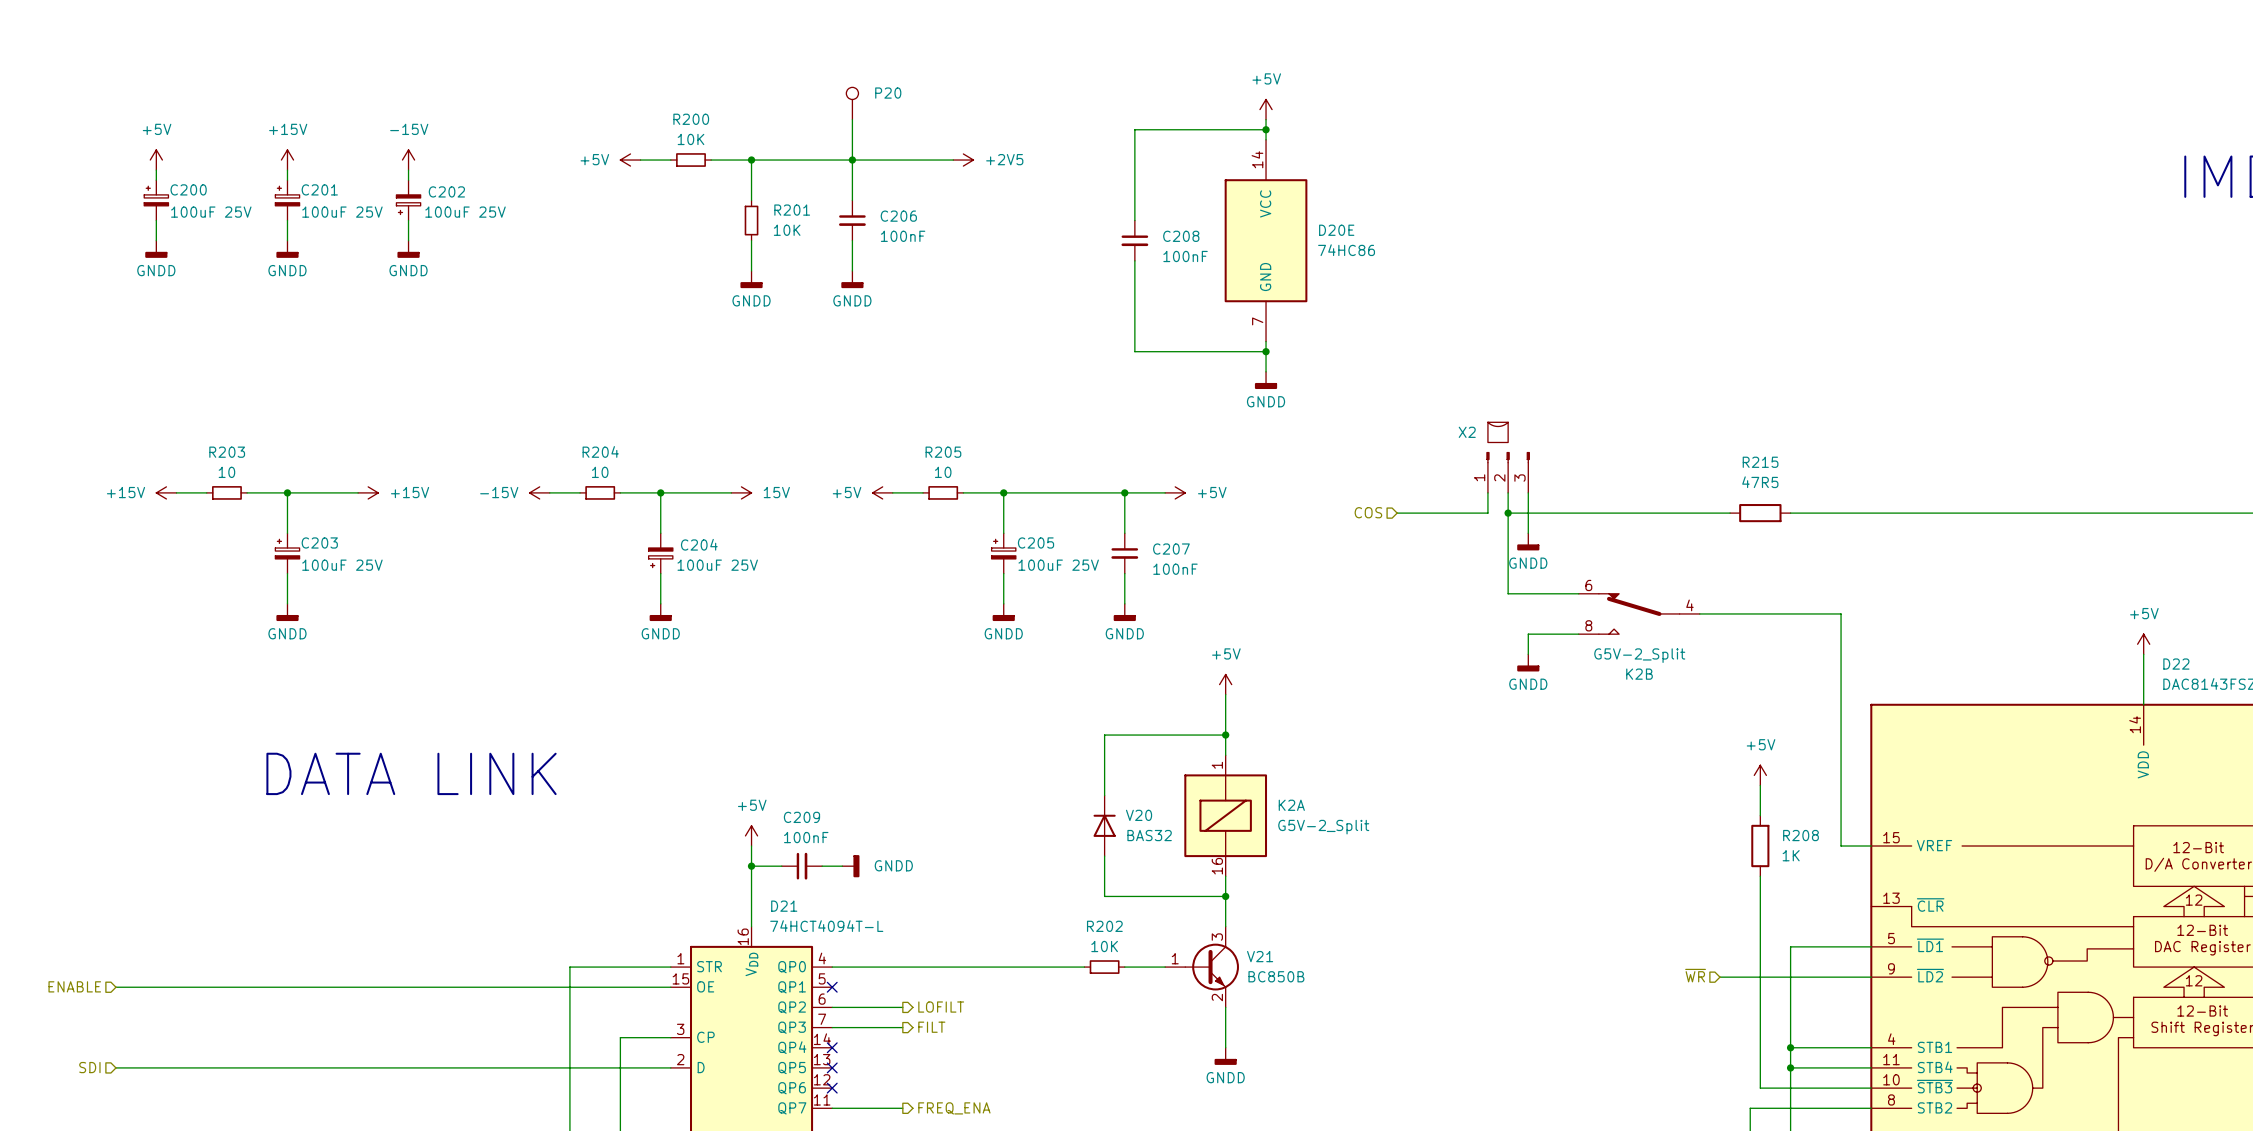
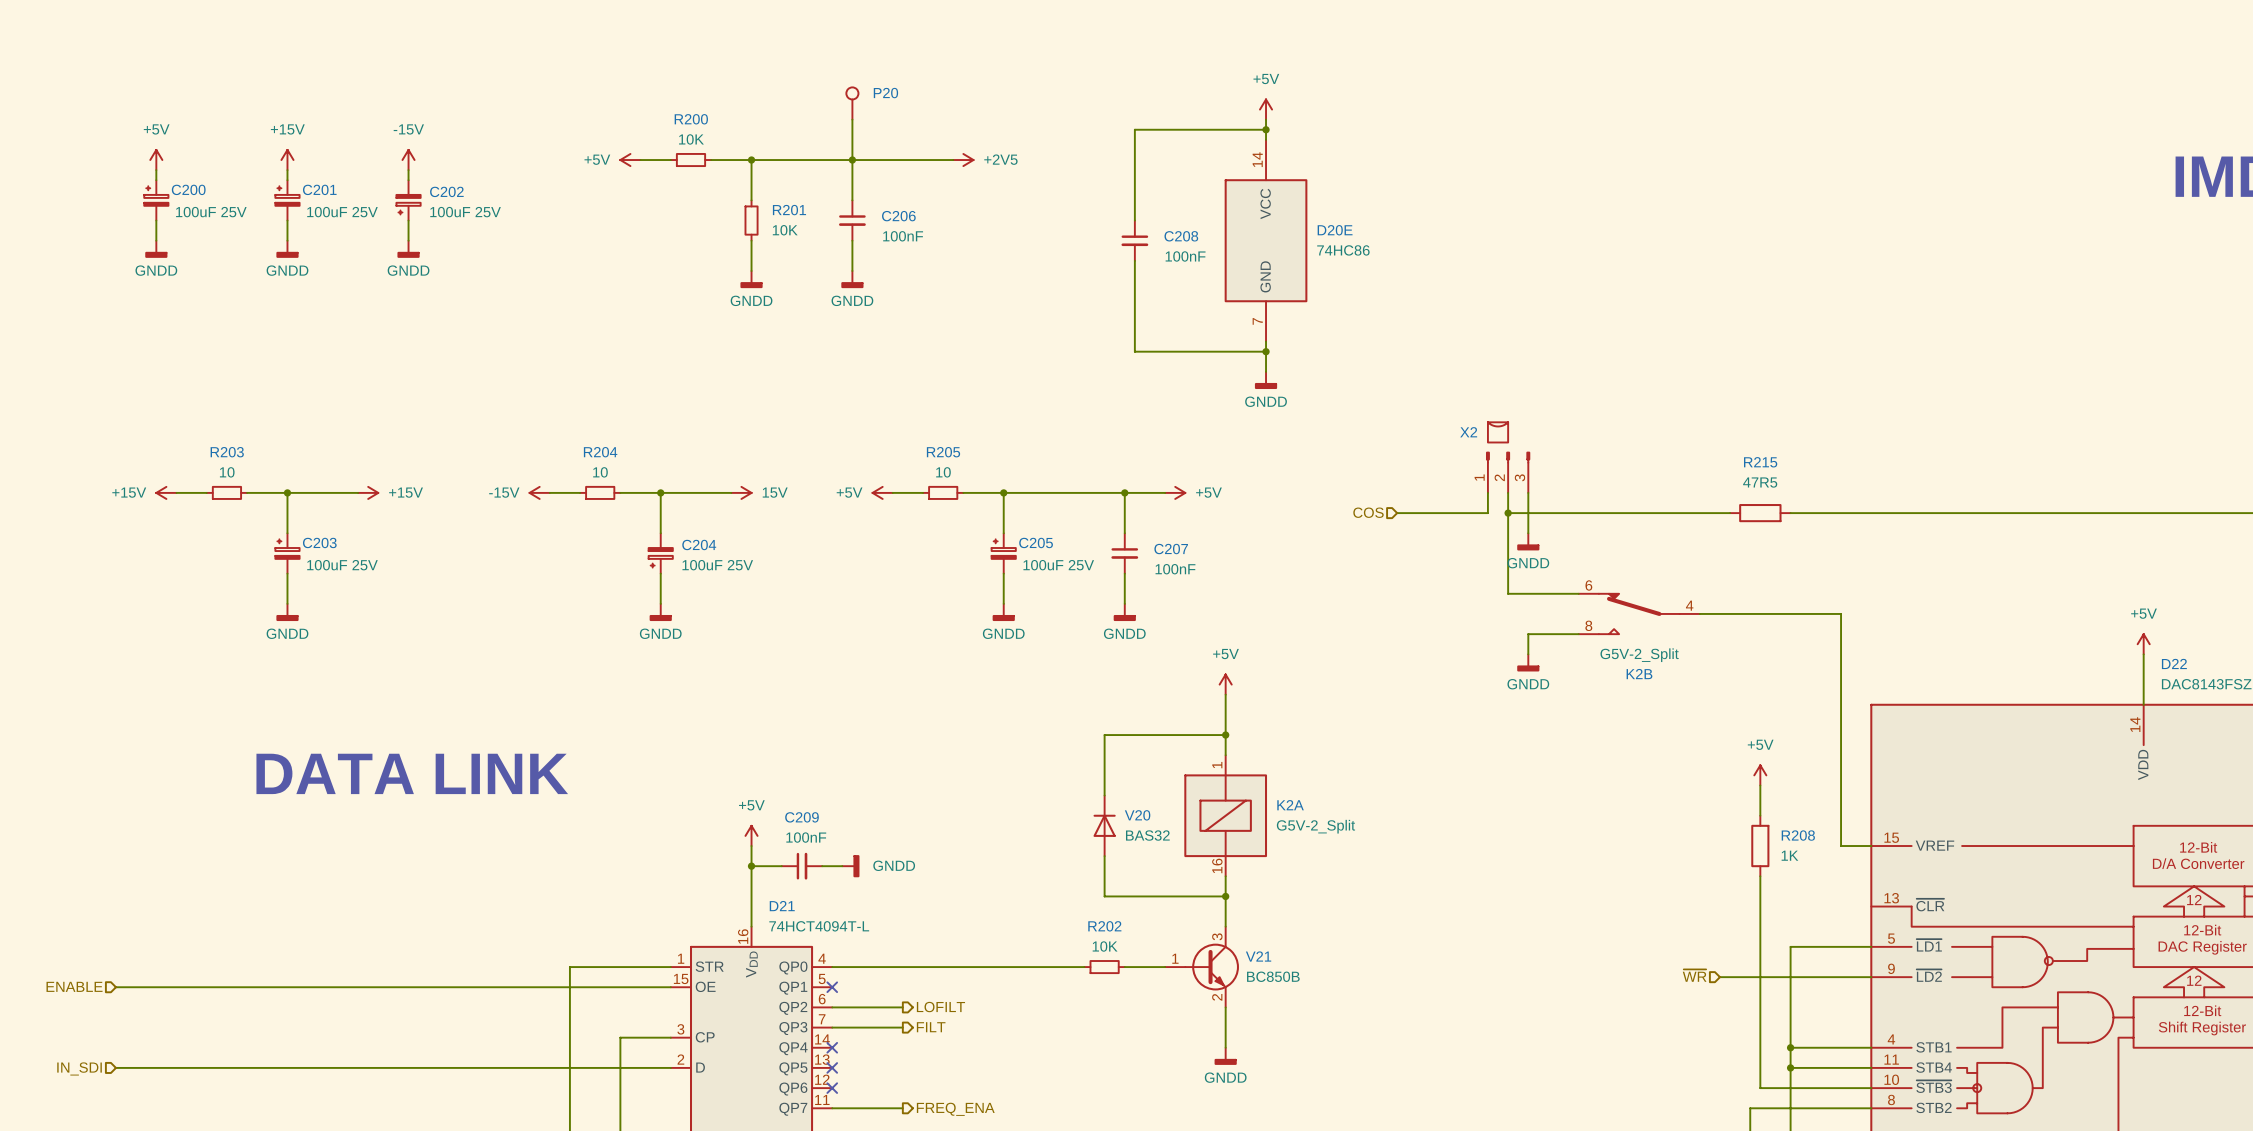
hierarchical label: SDI (89, 1067) -> IN_SDI (79, 1068)

